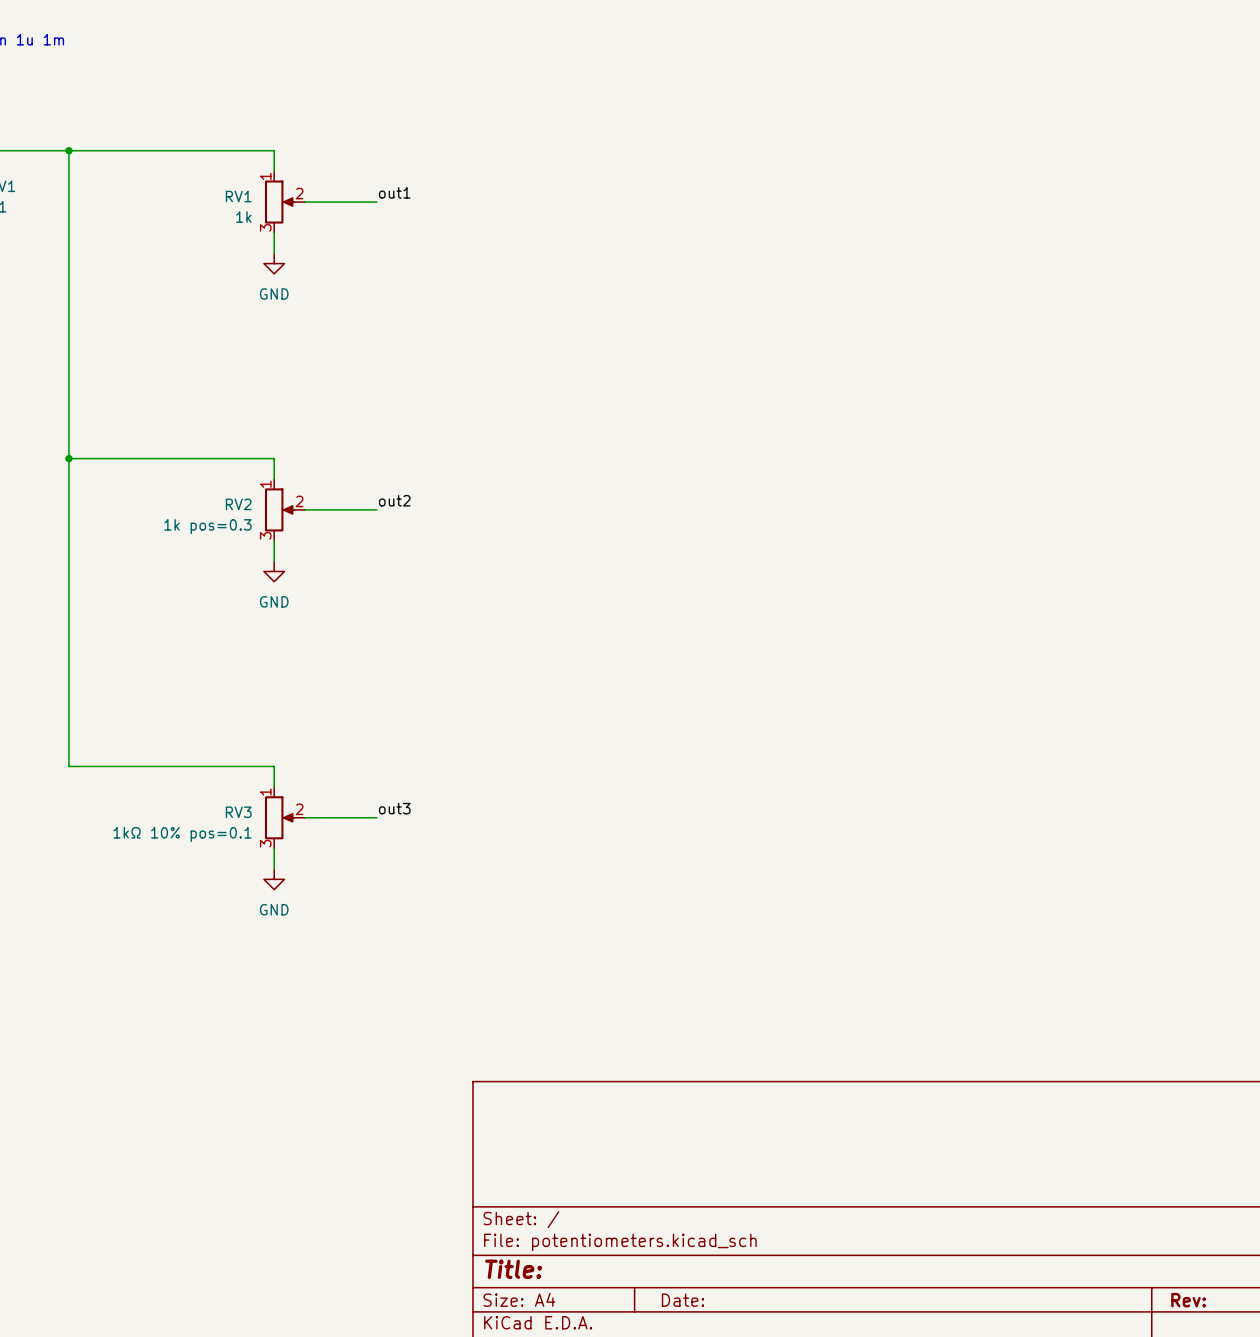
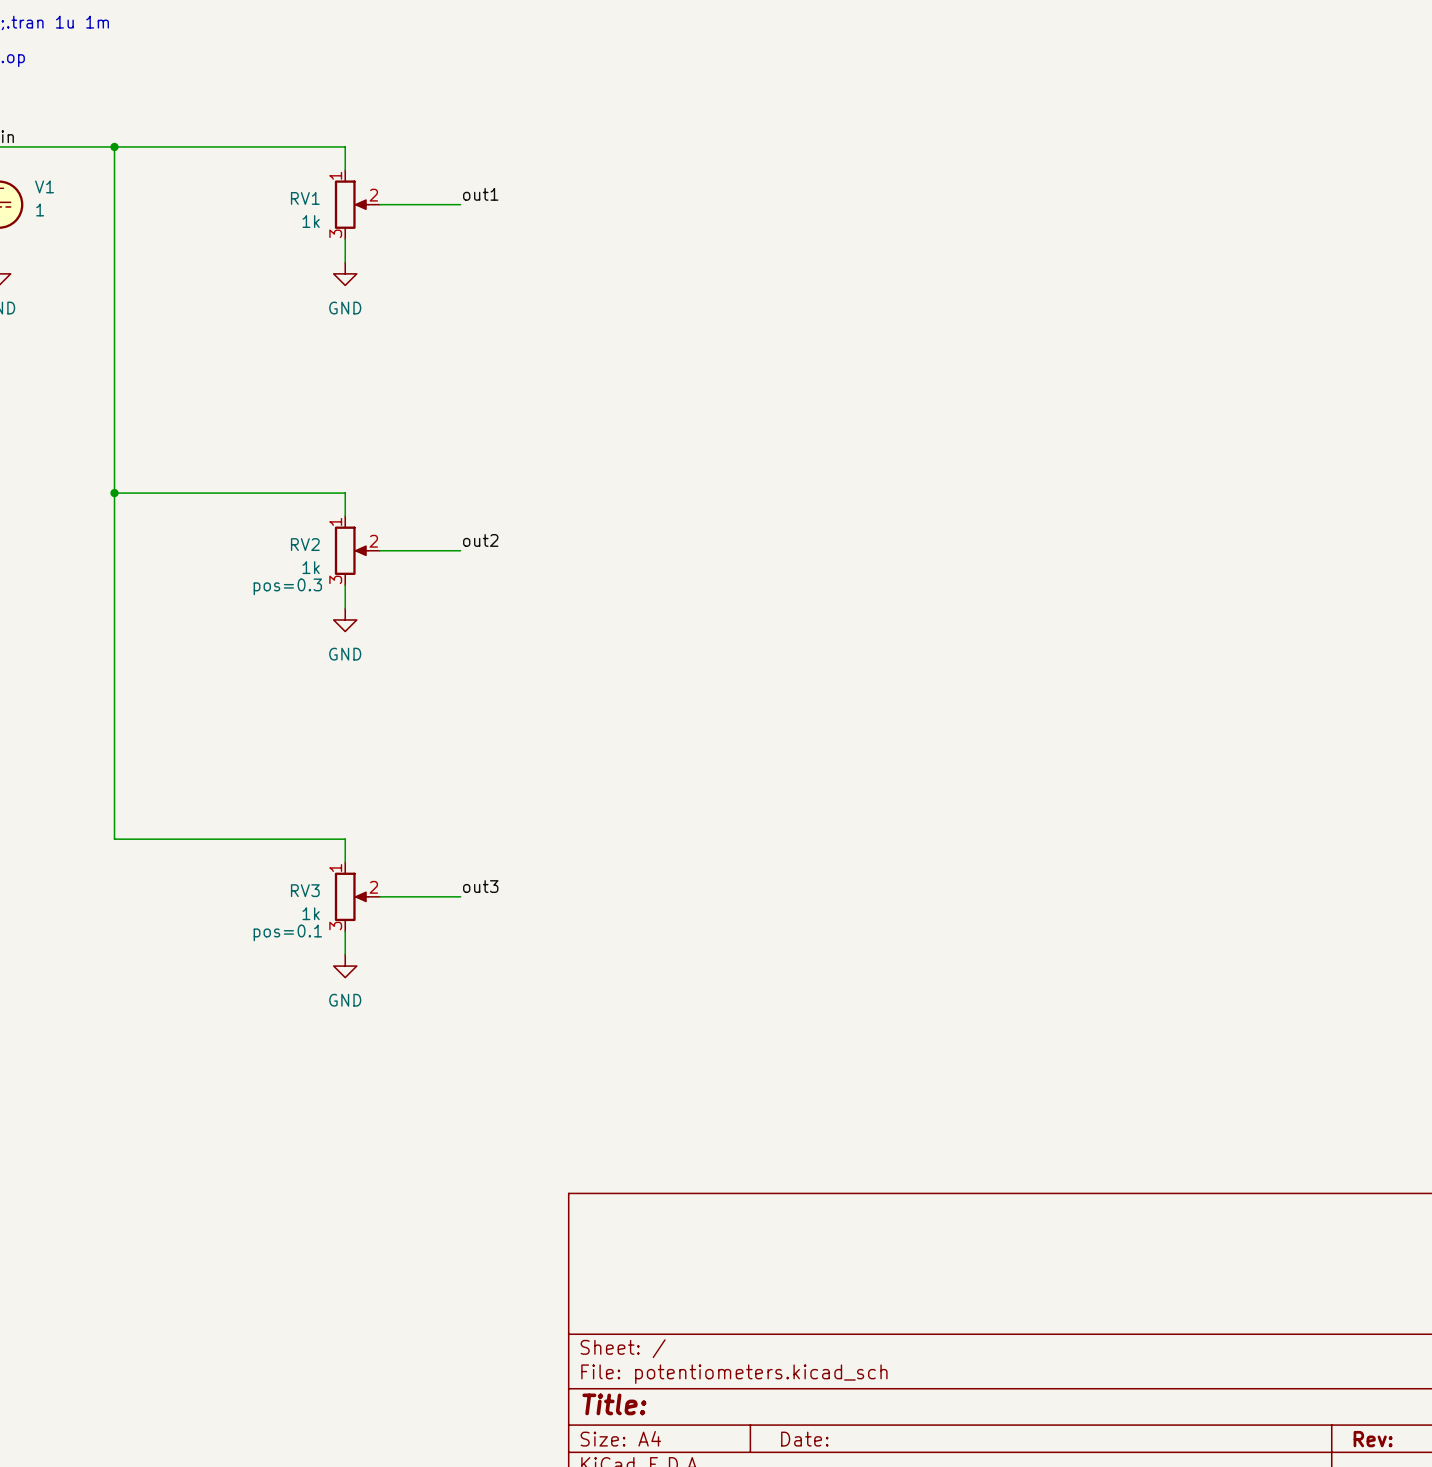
RV2 value: 1k pos=0.3 (207, 526) -> 1k (311, 567)
RV2 text: none -> pos=0.3 (287, 586)
RV3 value: 1kΩ 10% pos=0.1 (182, 834) -> 1k (311, 913)
RV3 text: none -> pos=0.1 (287, 932)

